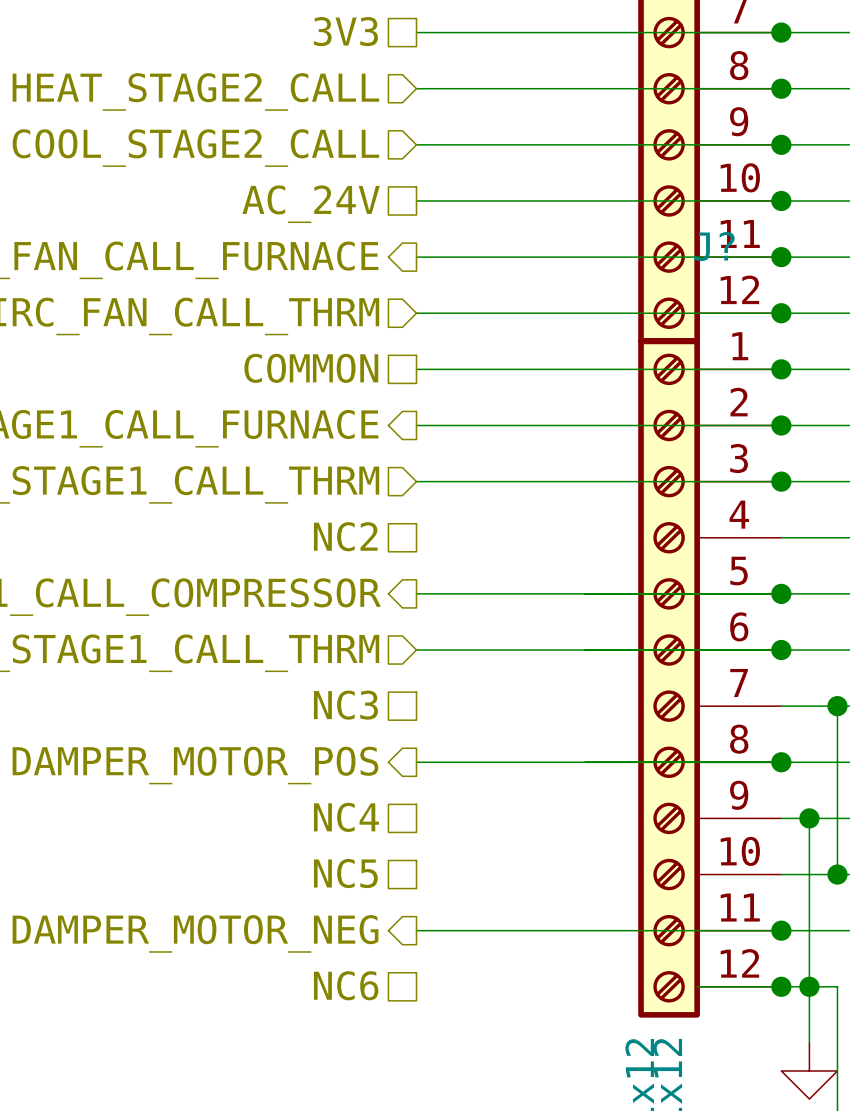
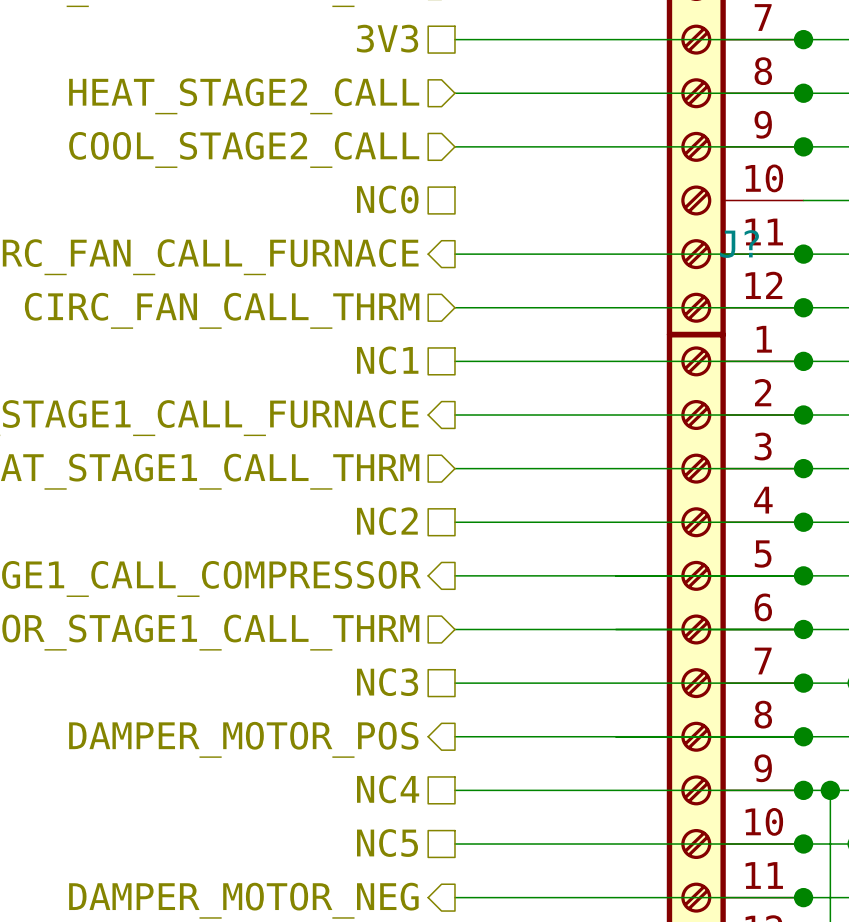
wire: (416, 200) (781, 200) -> (454, 522) (803, 522)
junction: (781, 200) -> none
hierarchical label: AC_24V (311, 204) -> NC0 (387, 199)
hierarchical label: COMMON (311, 368) -> NC1 (387, 360)
junction: none -> (803, 522)
wire: none -> (454, 683) (803, 683)
junction: none -> (803, 683)
wire: none -> (454, 790) (803, 790)
junction: none -> (803, 790)
wire: none -> (454, 844) (803, 844)
junction: none -> (803, 844)

